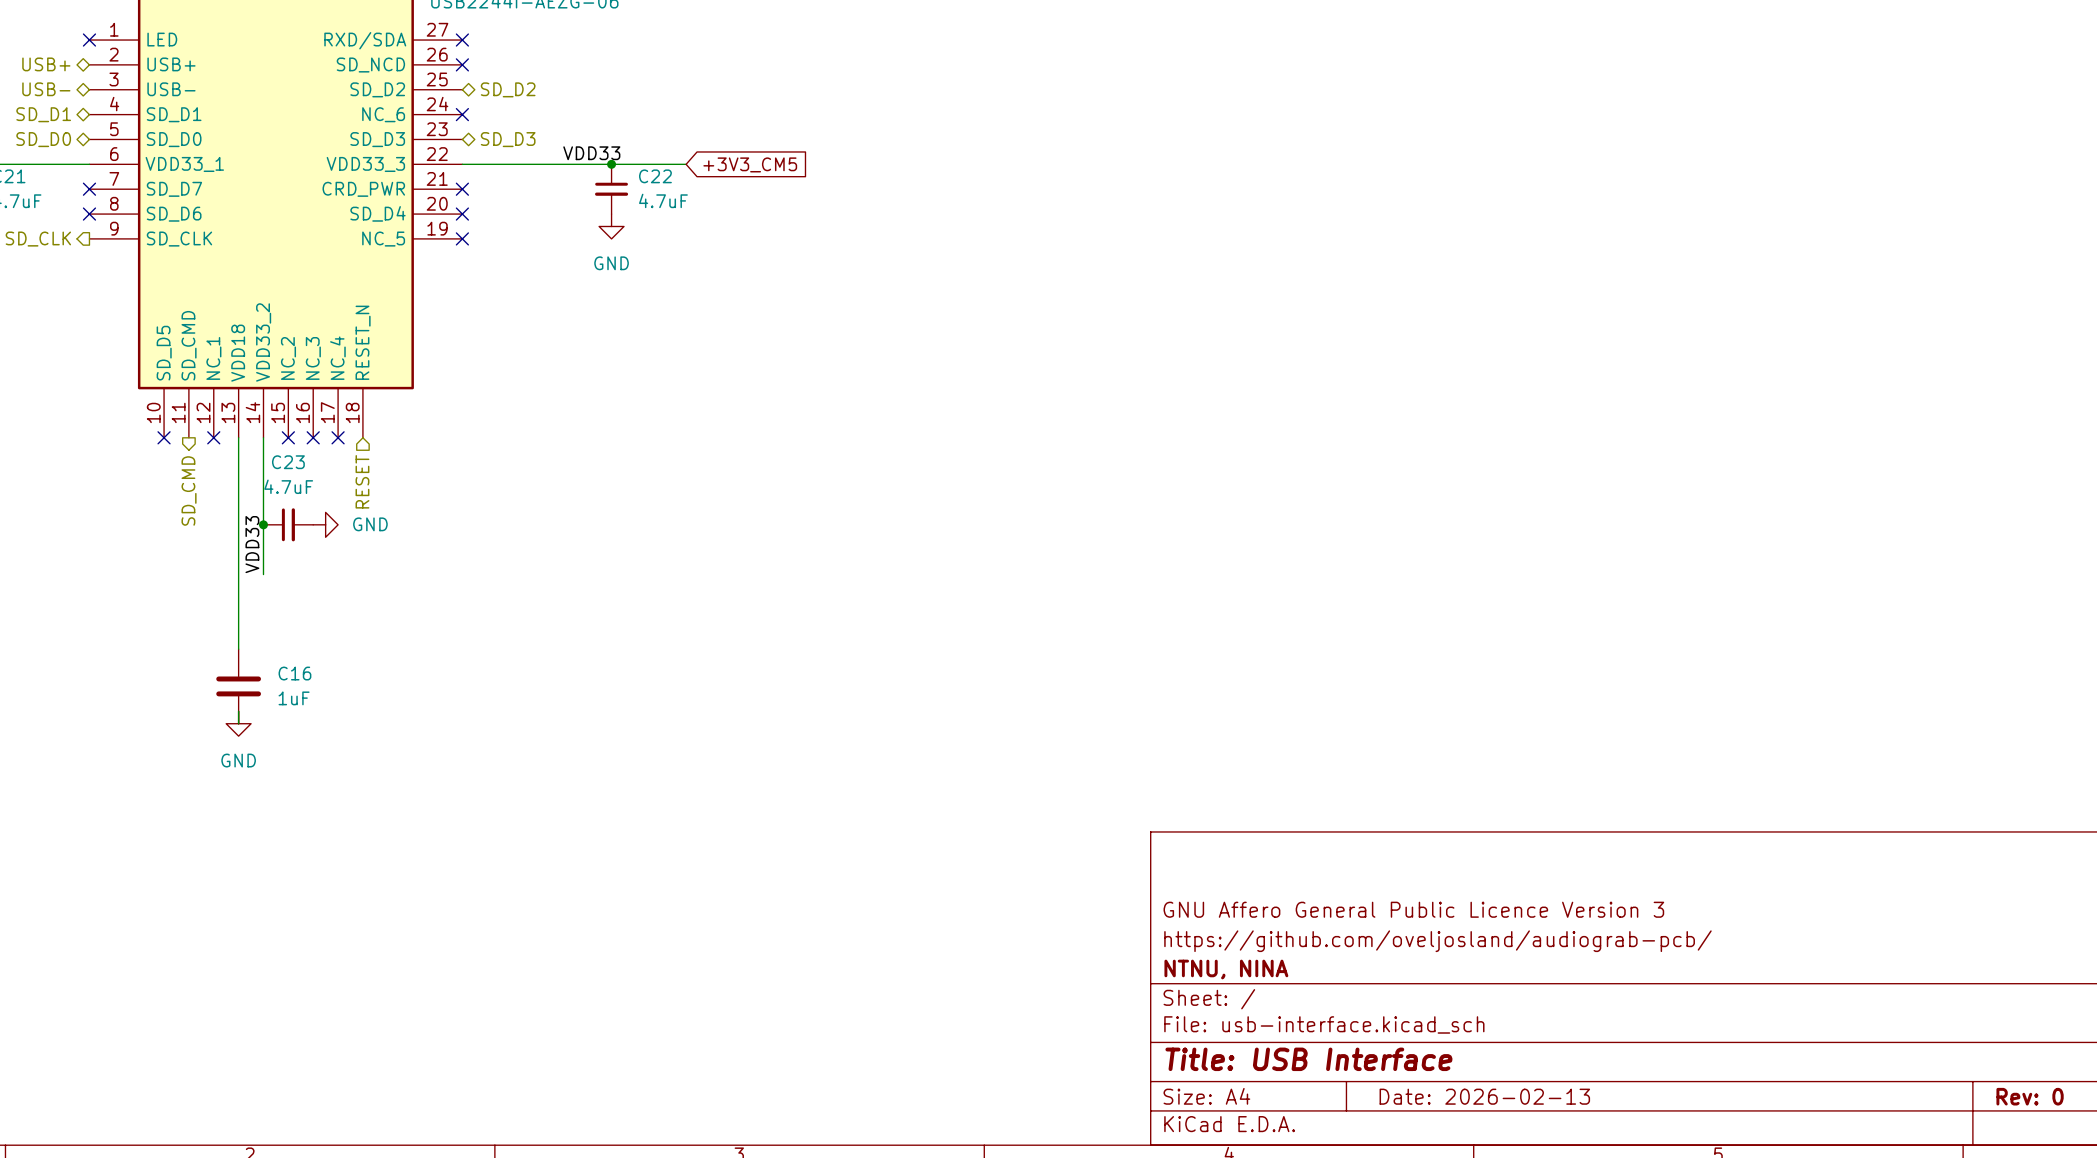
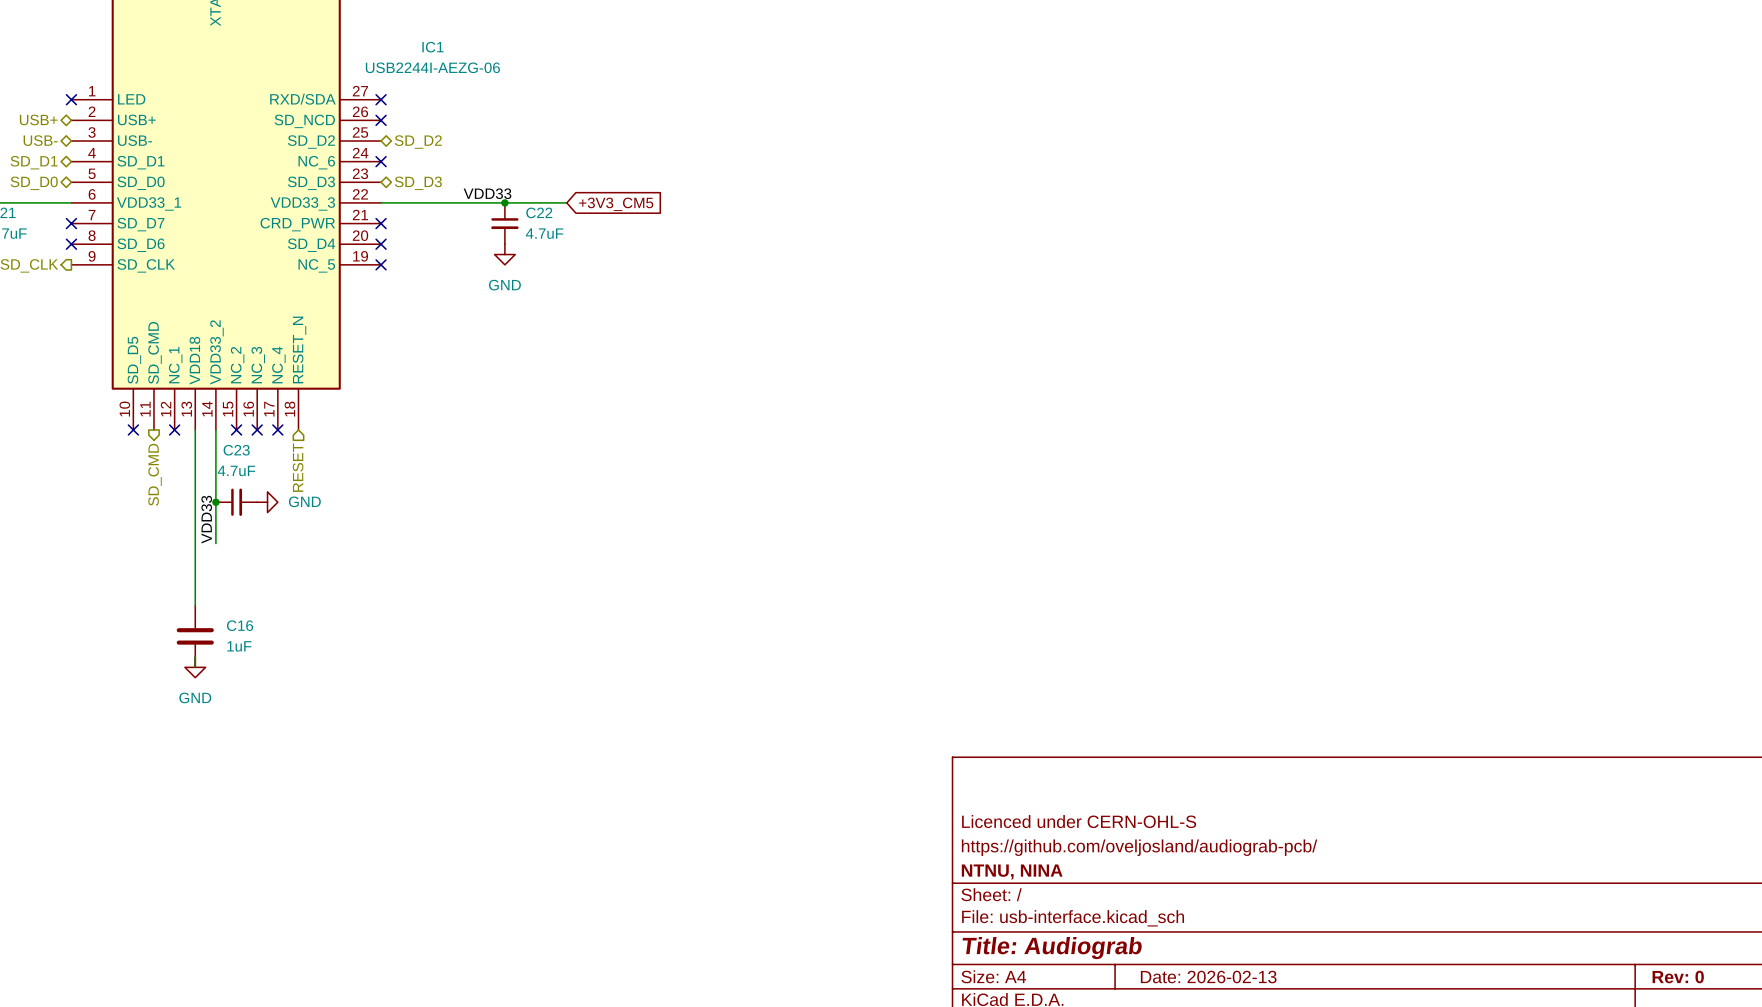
title block: GNU Affero General Public Licence Version 3 (1413, 909) -> Licenced under CERN-OHL-S (1079, 821)
title block: Title: USB Interface (1308, 1059) -> Title: Audiograb (1052, 948)

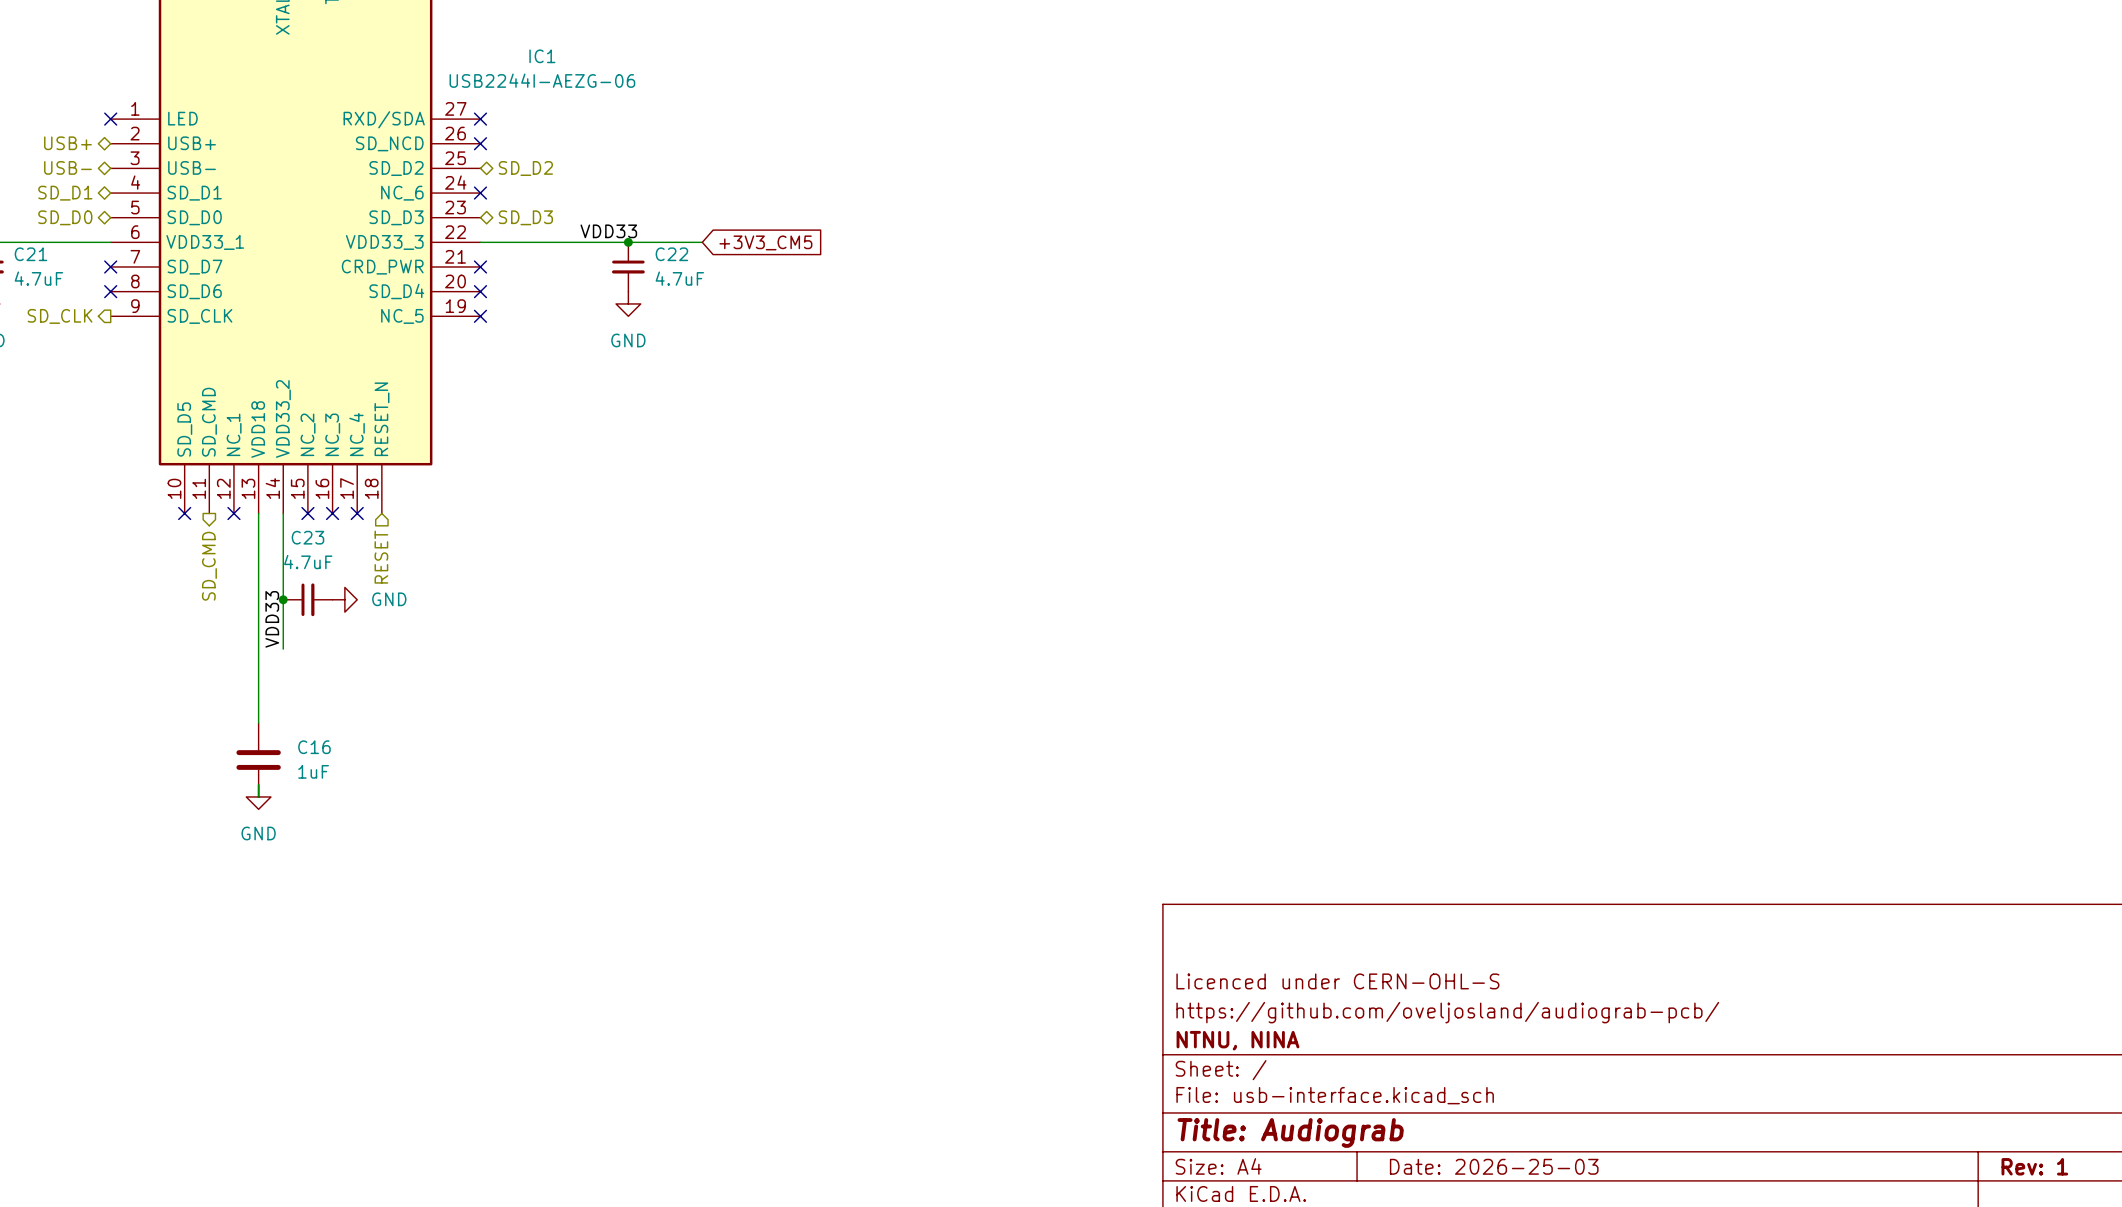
title block: Date: 2026-02-13 (1208, 977) -> Date: 2026-25-03 (1494, 1166)
title block: Rev: 0 (1678, 977) -> Rev: 1 (2034, 1166)

